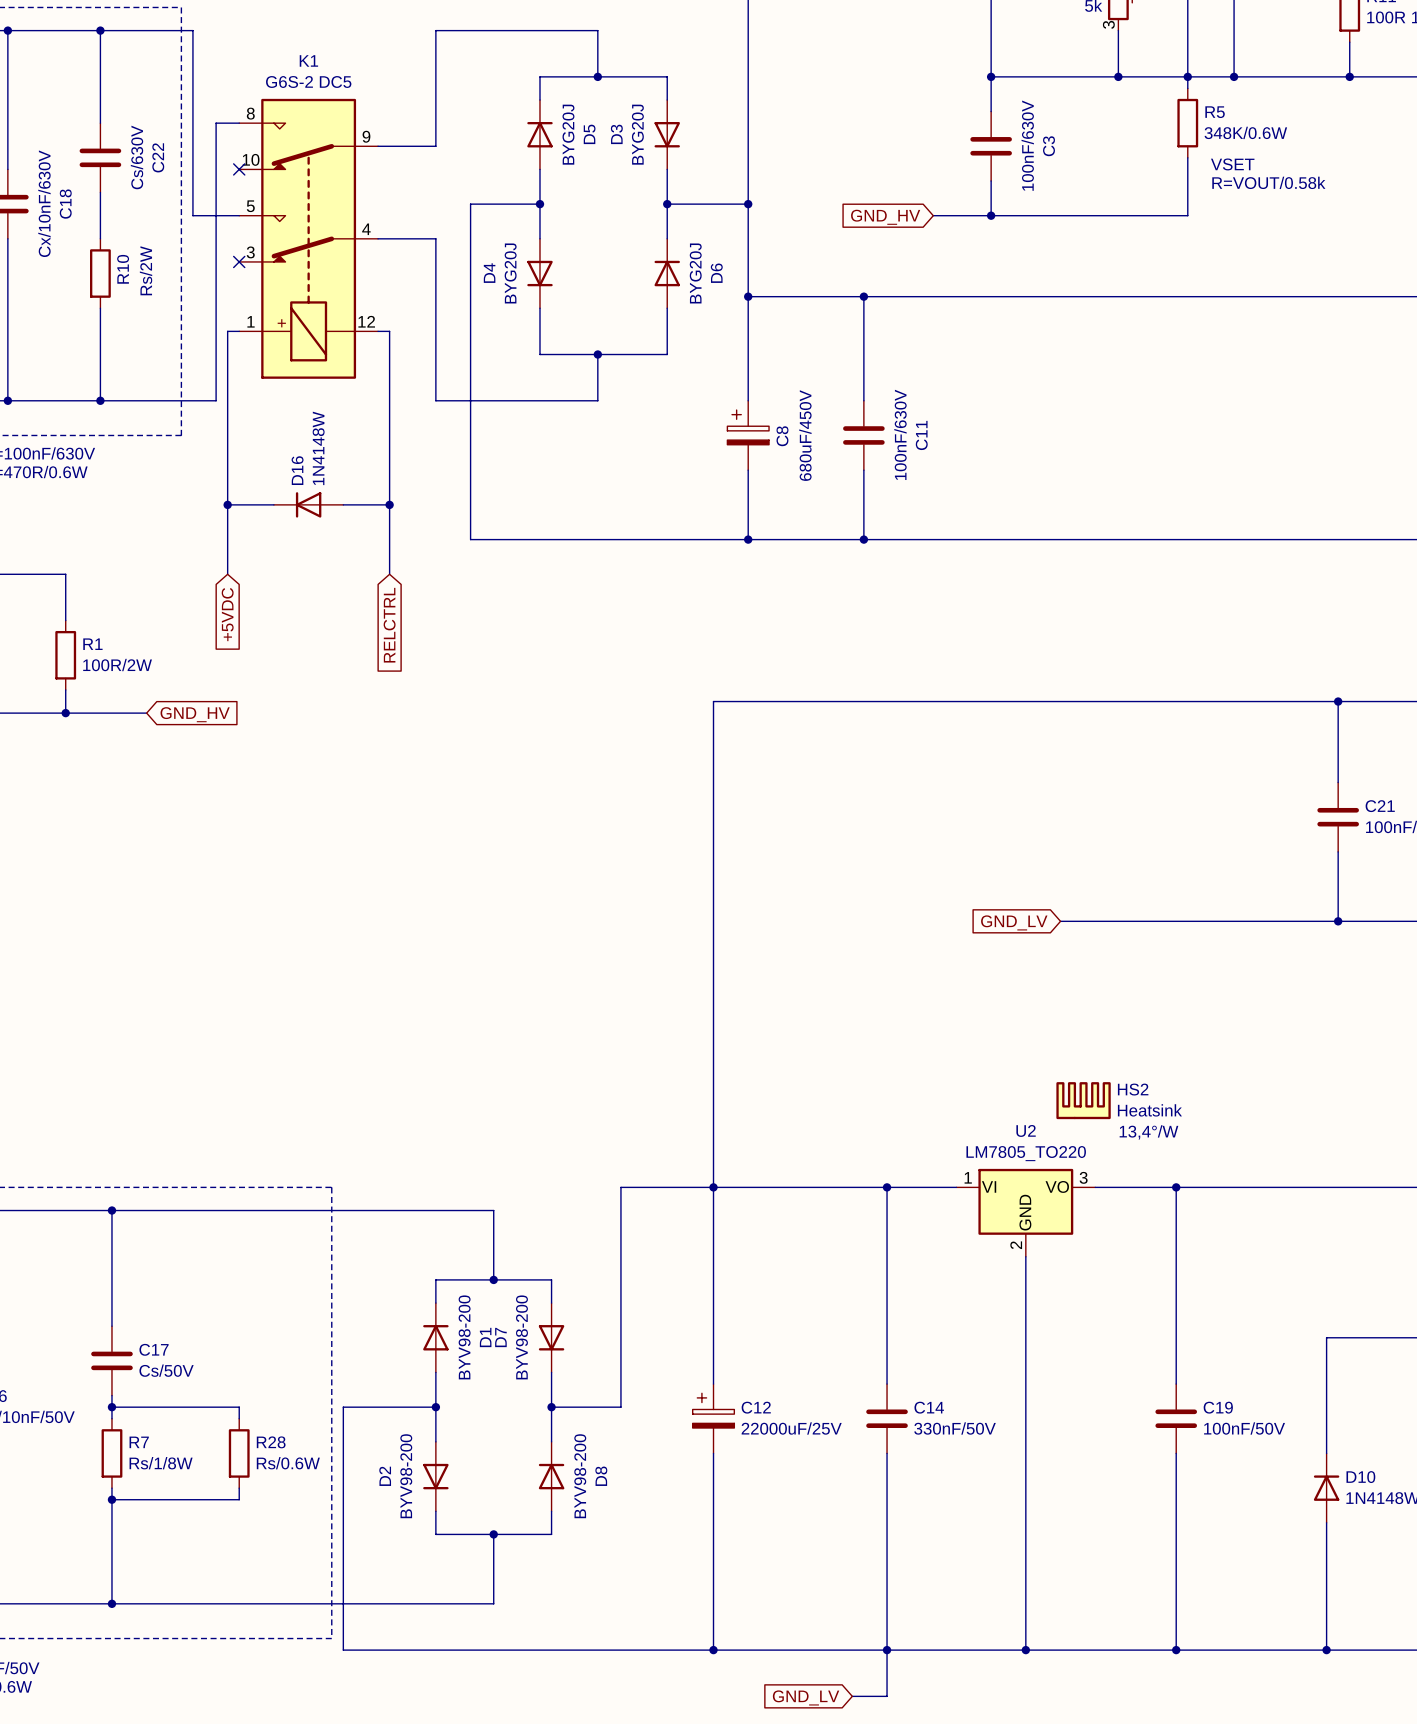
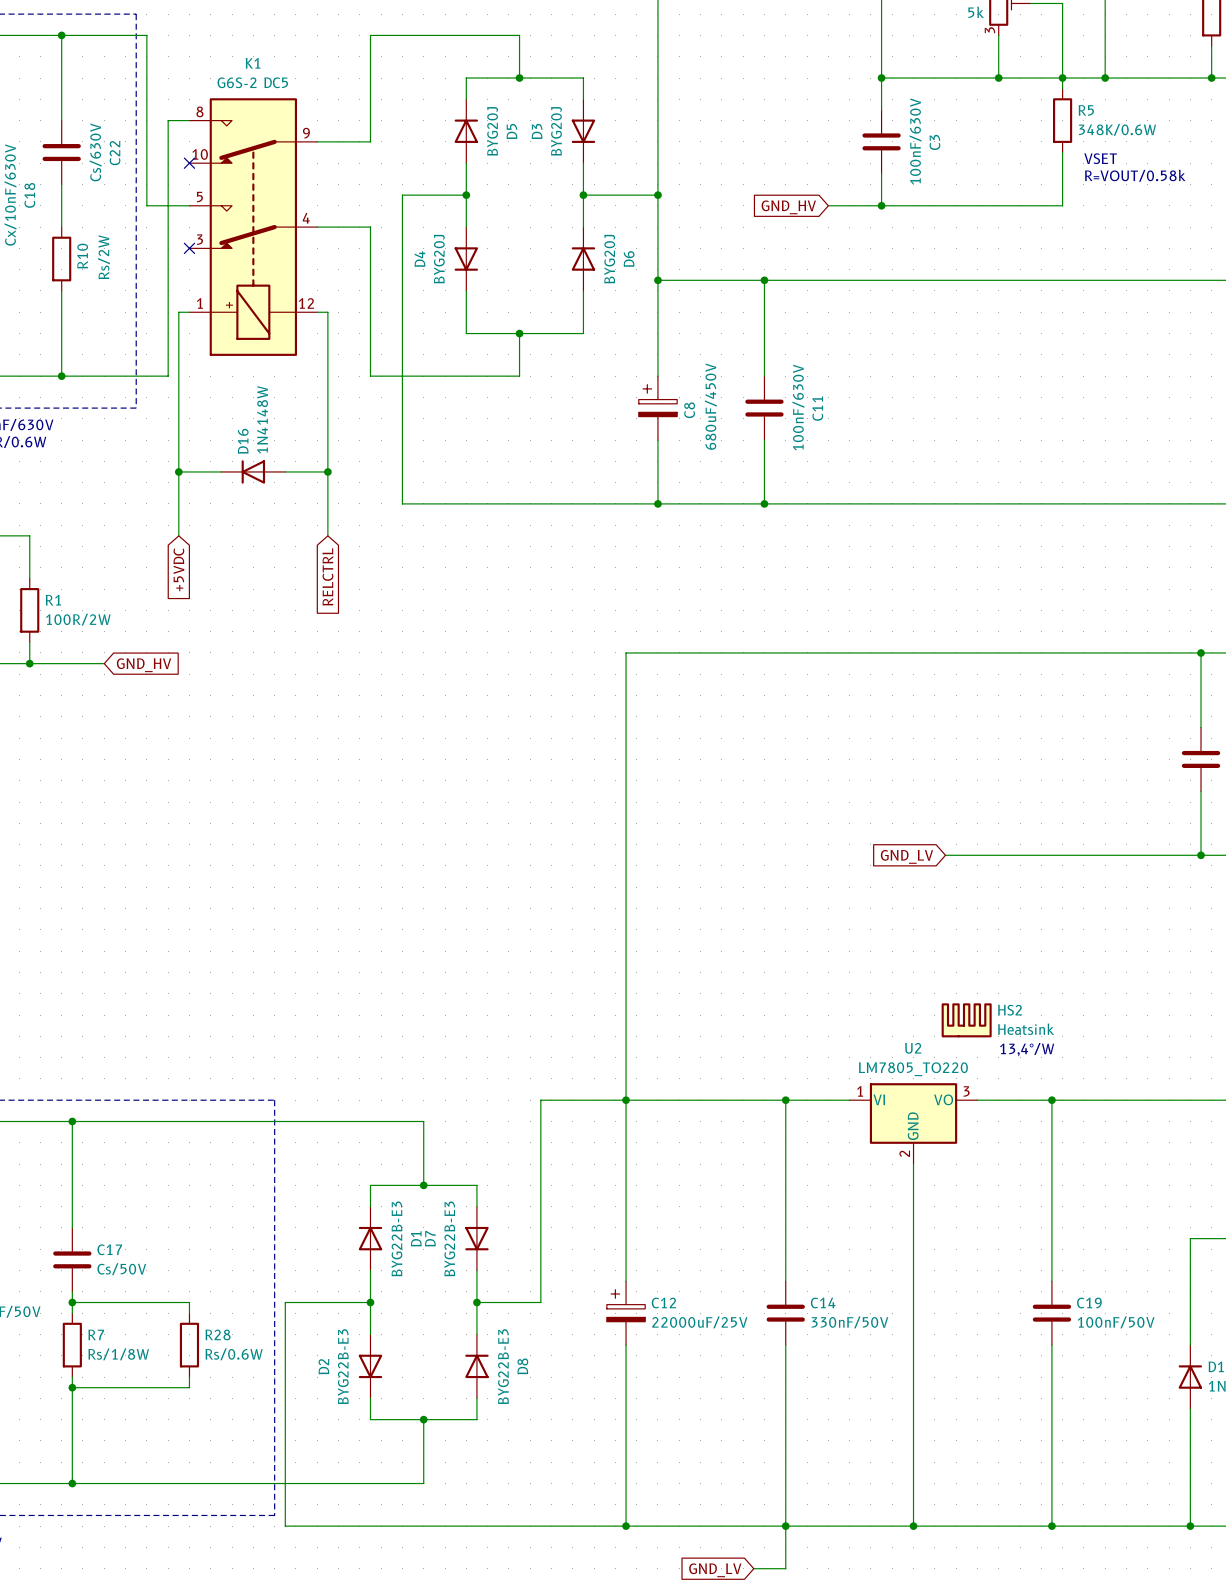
D1 value: BYV98-200 (464, 1337) -> BYG22B-E3 (396, 1238)
D7 value: BYV98-200 (521, 1337) -> BYG22B-E3 (449, 1238)
D2 value: BYV98-200 (406, 1476) -> BYG22B-E3 (343, 1366)
D8 value: BYV98-200 (580, 1476) -> BYG22B-E3 (503, 1366)

